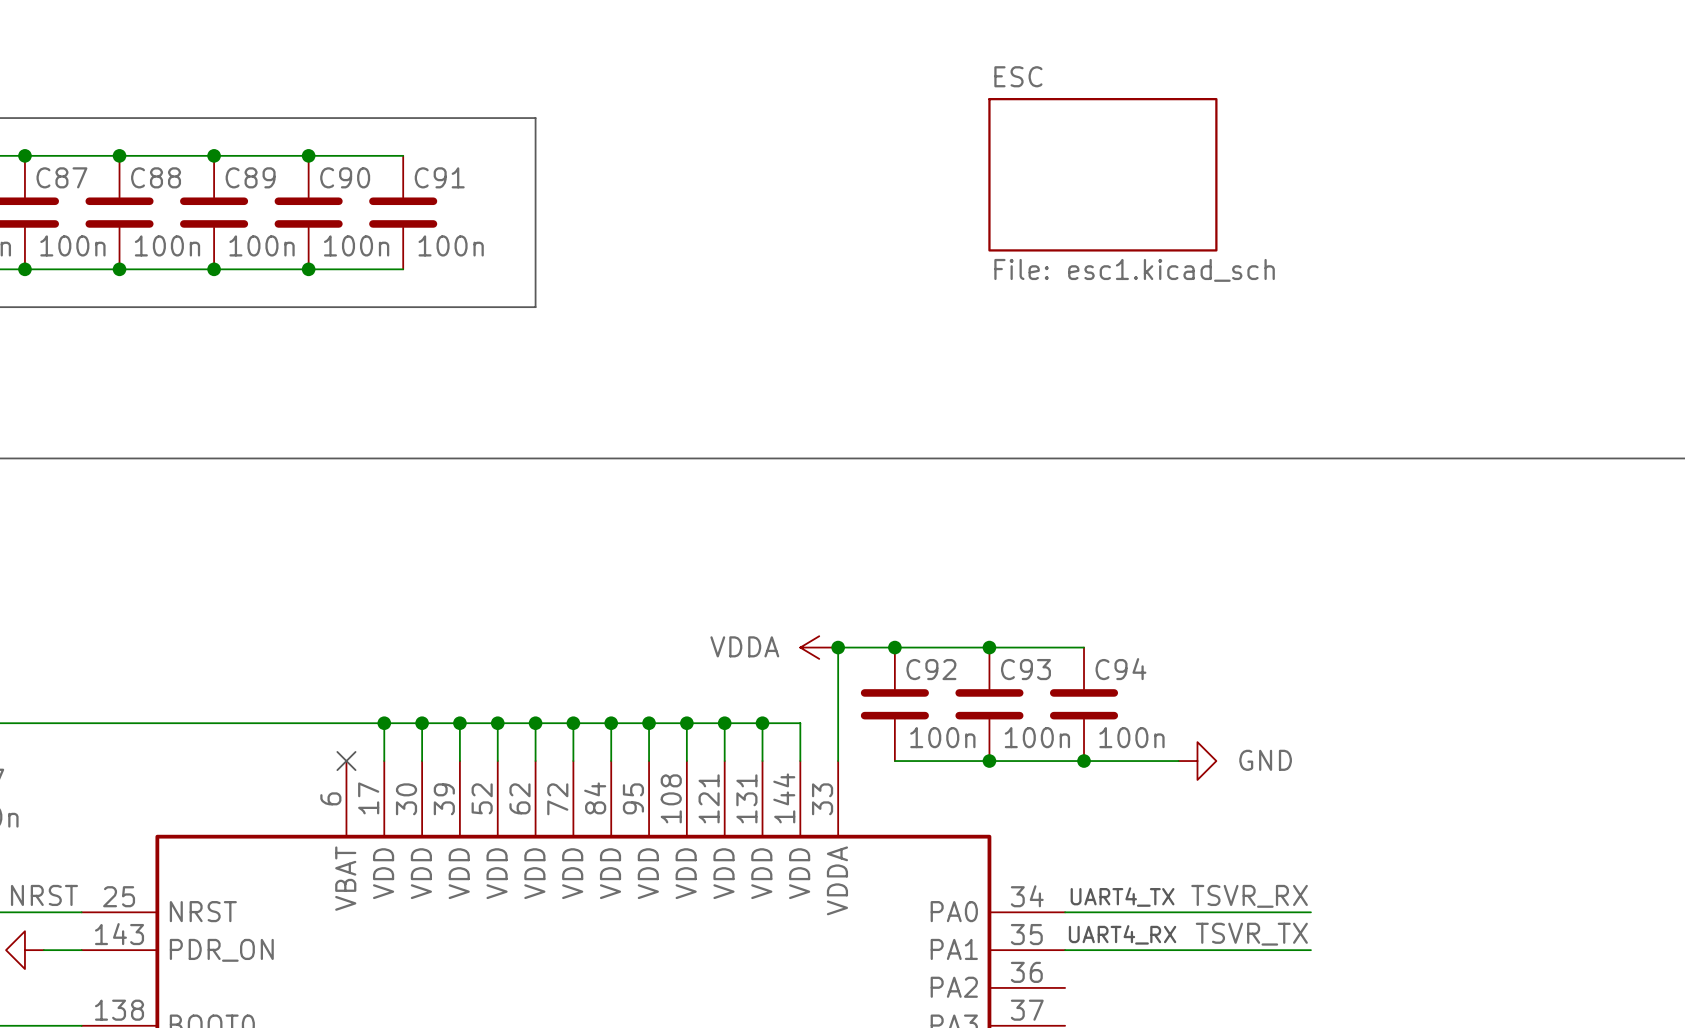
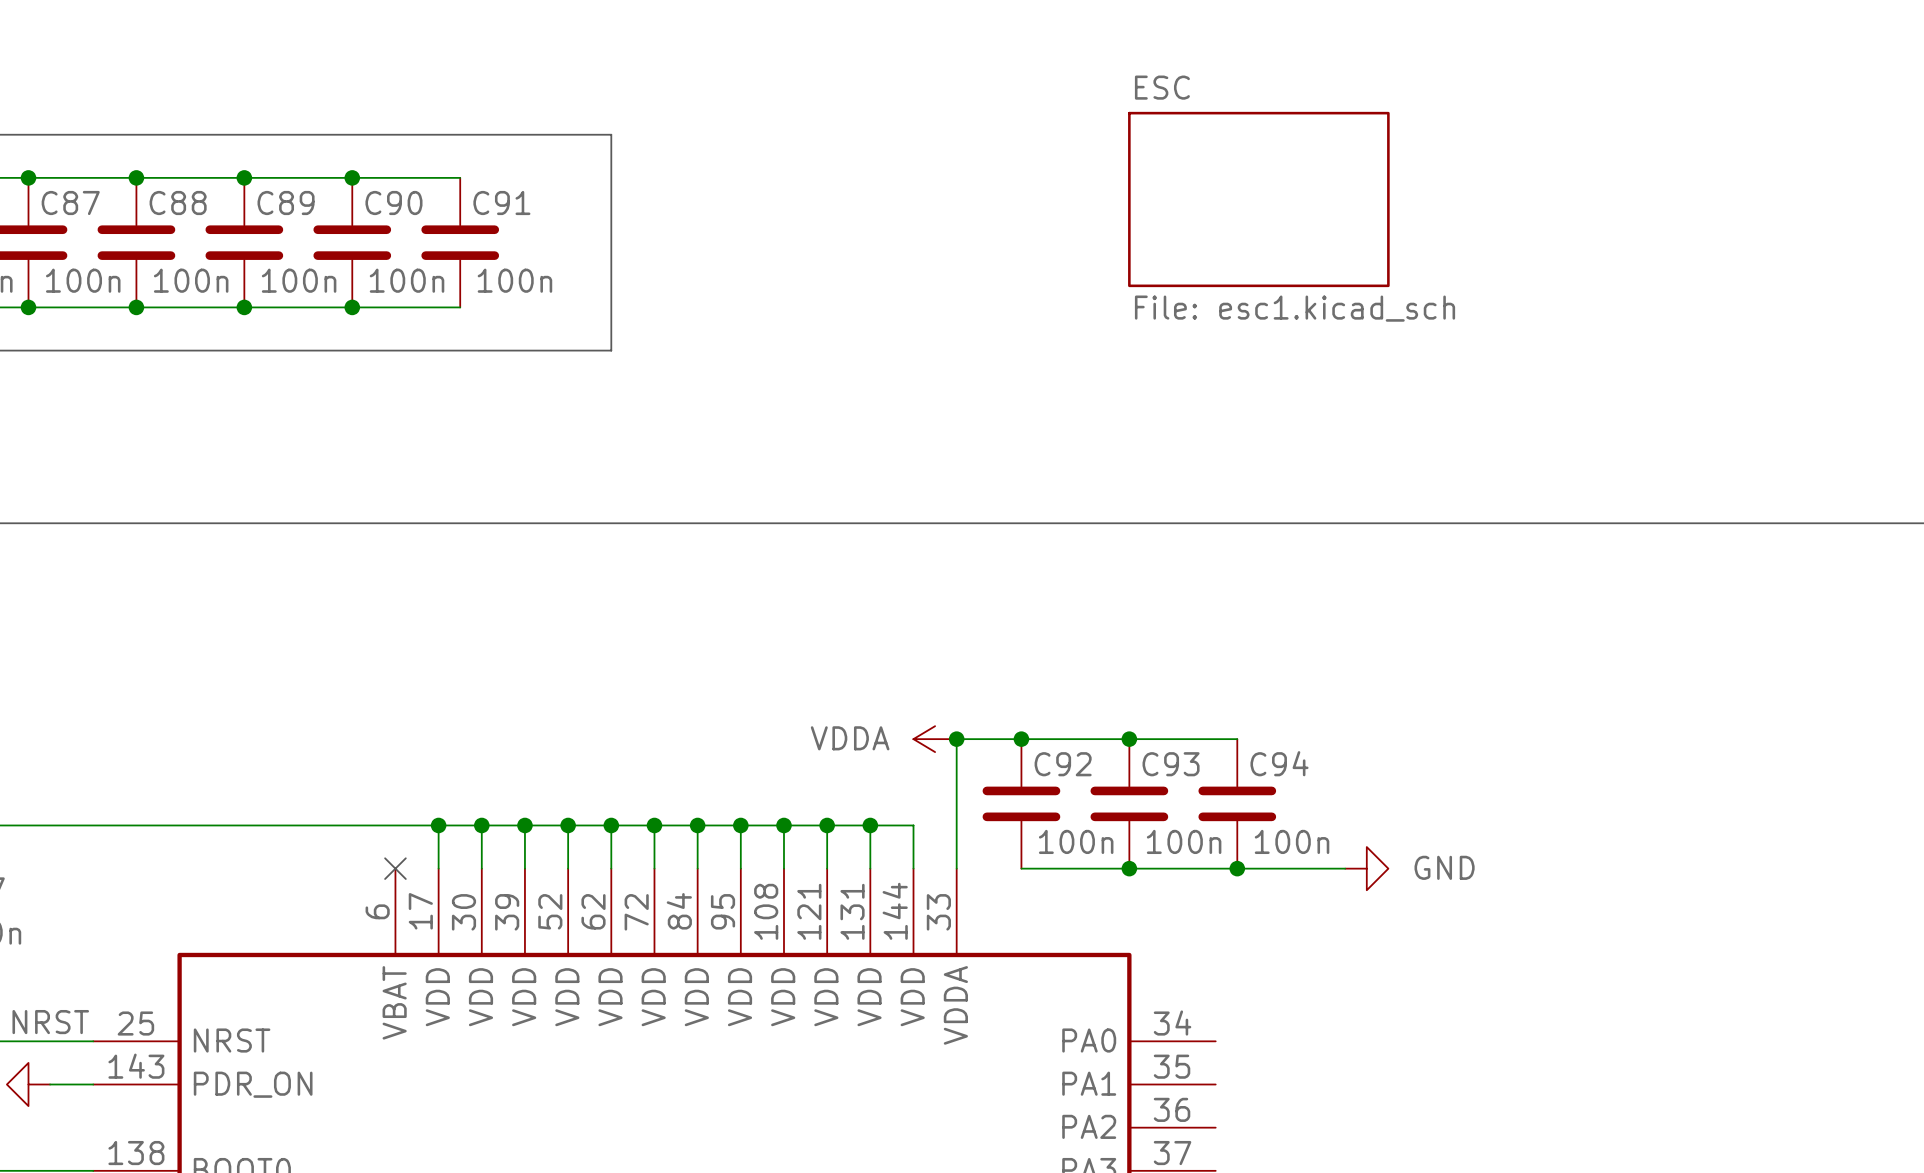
label: TSVR_RX (1249, 896) -> none
text: UART4_TX (1122, 897) -> none
wire: (1065, 912) (1310, 912) -> none
text: UART4_RX (1122, 934) -> none
label: TSVR_TX (1251, 934) -> none
wire: (1065, 950) (1310, 950) -> none

